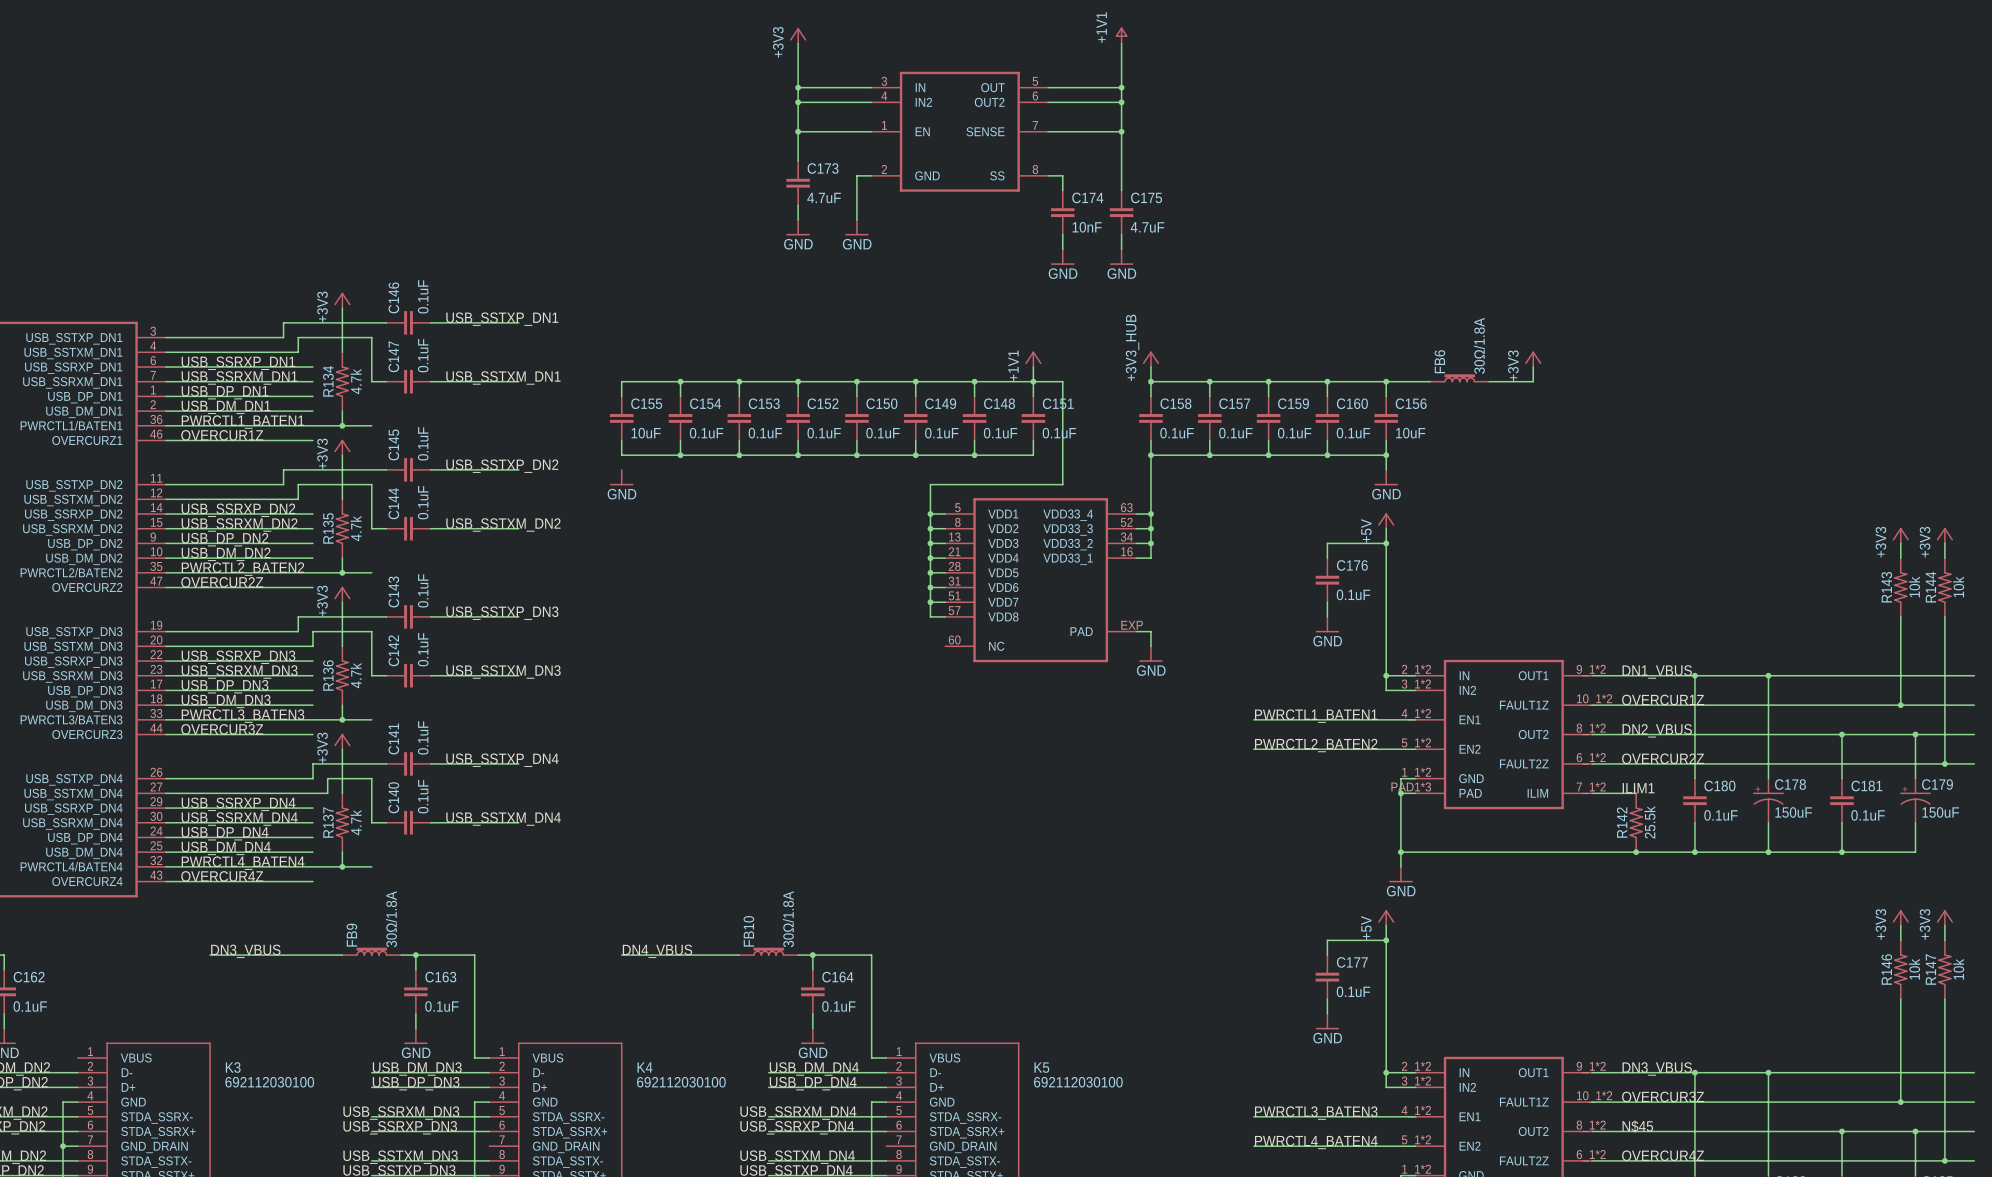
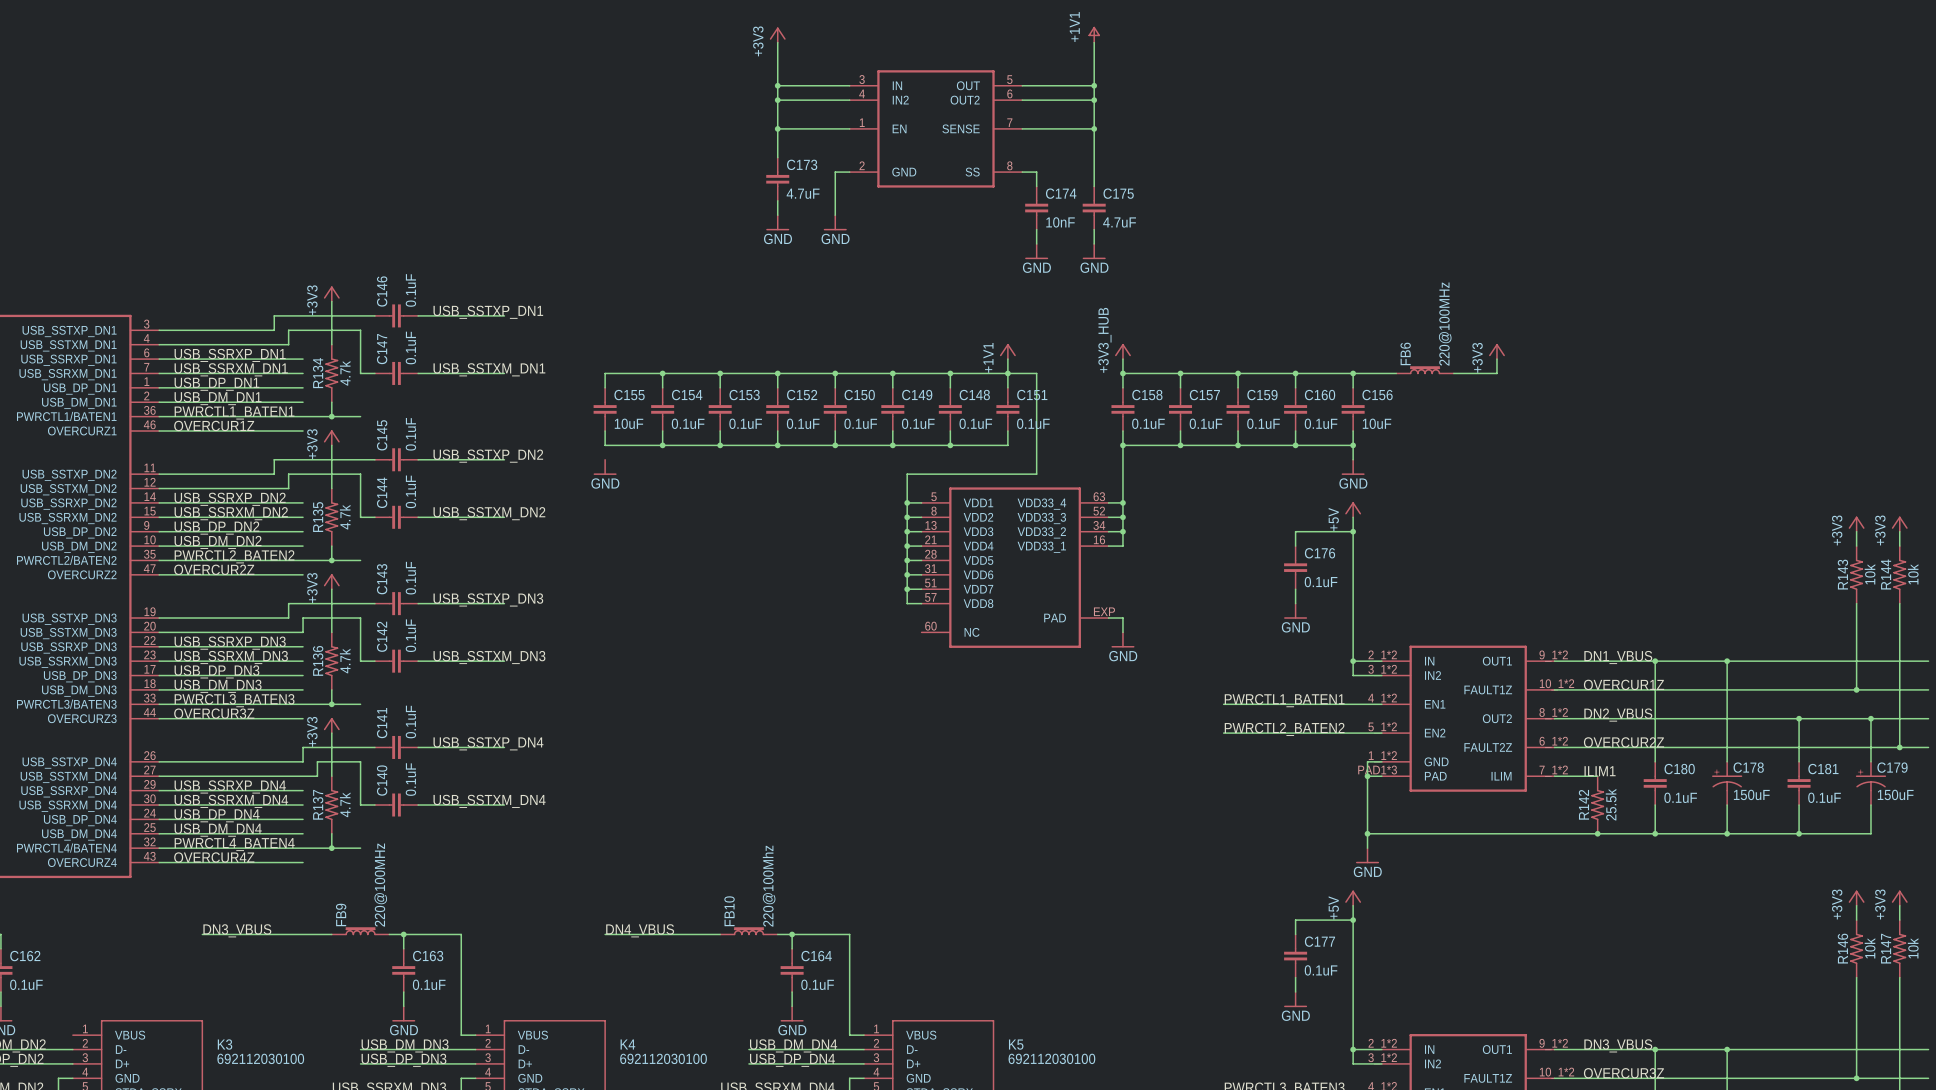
FB6 value: 30Ω/1.8A (1479, 345) -> 220@100MHz (1445, 324)
FB9 value: 30Ω/1.8A (391, 919) -> 220@100MHz (380, 885)
FB10 value: 30Ω/1.8A (788, 919) -> 220@100Mhz (769, 886)

